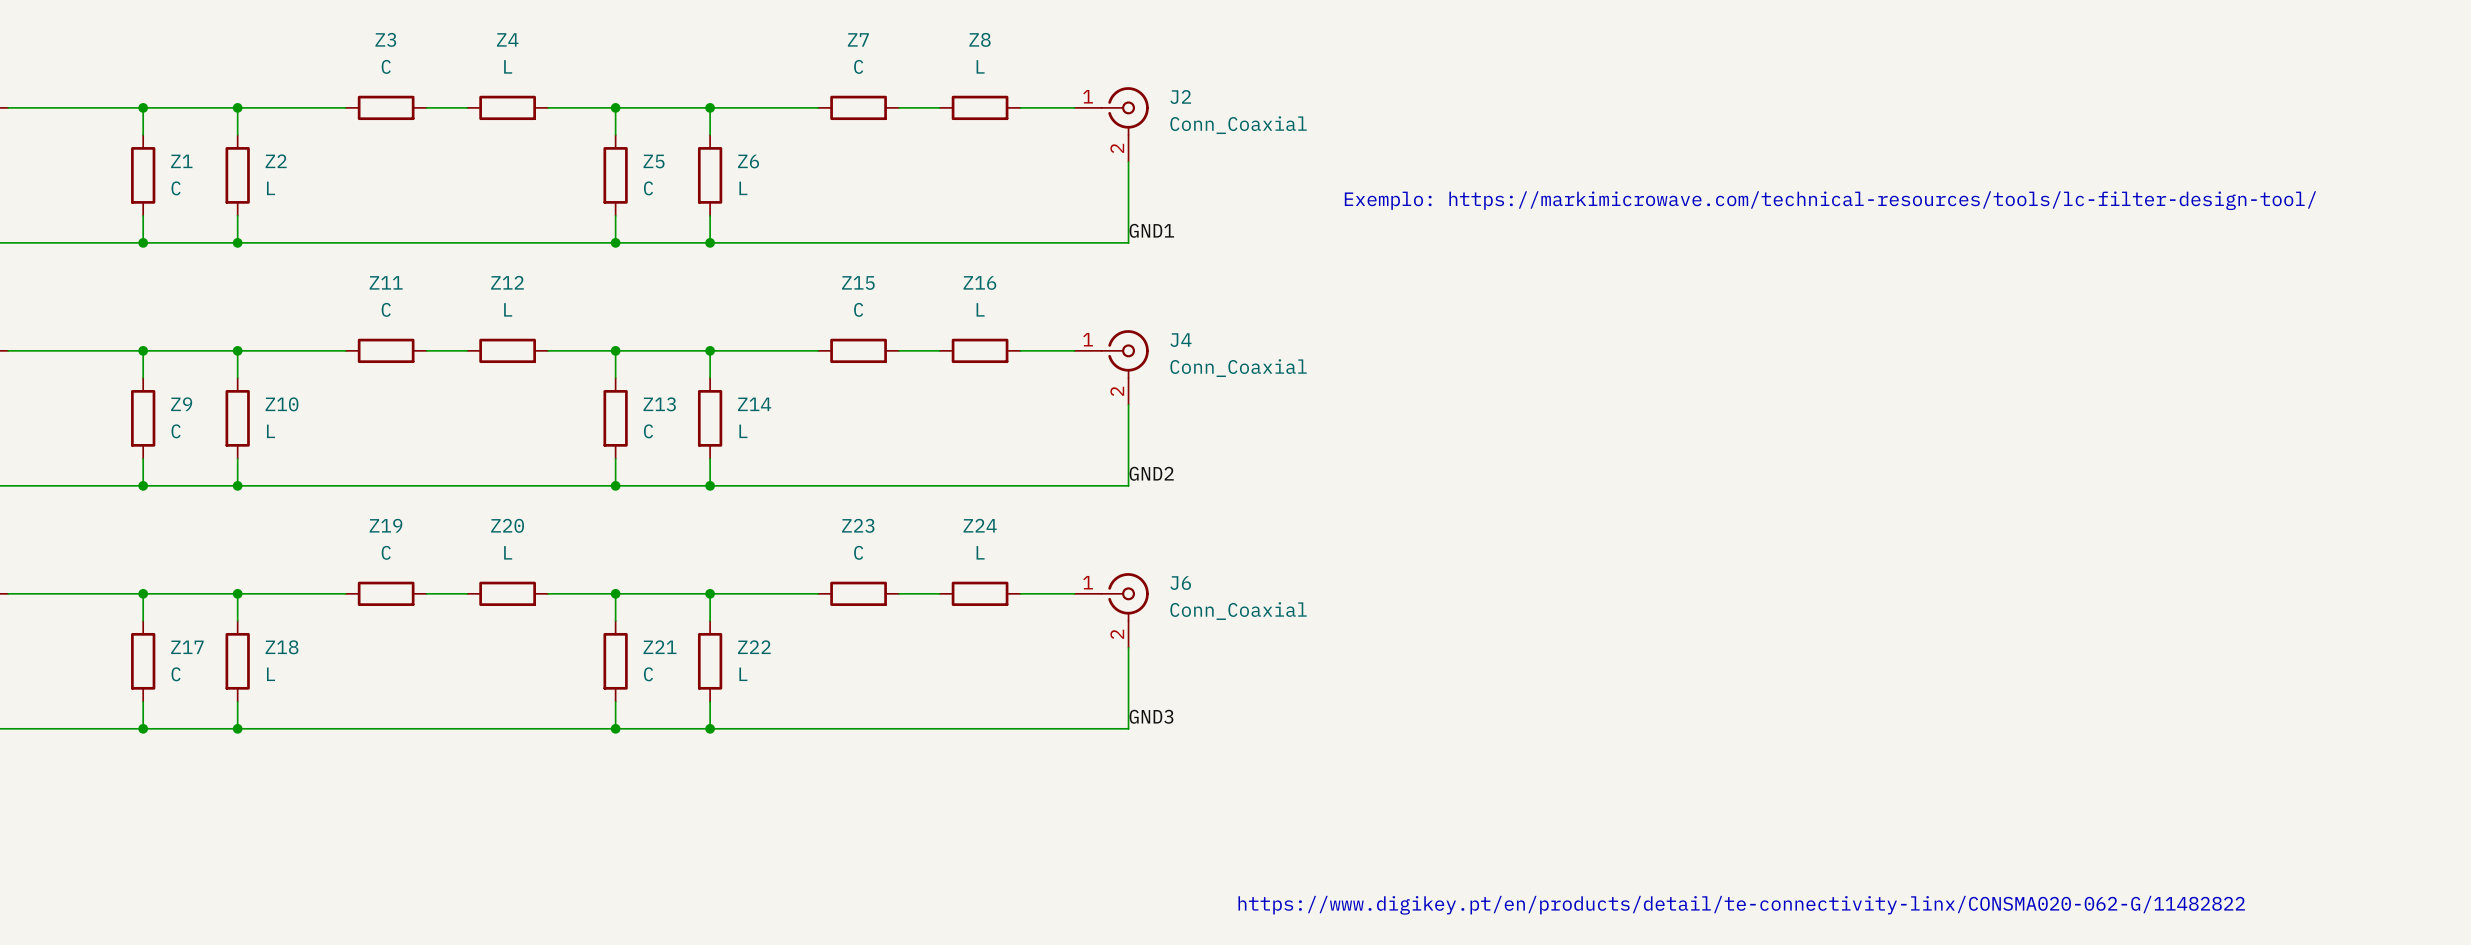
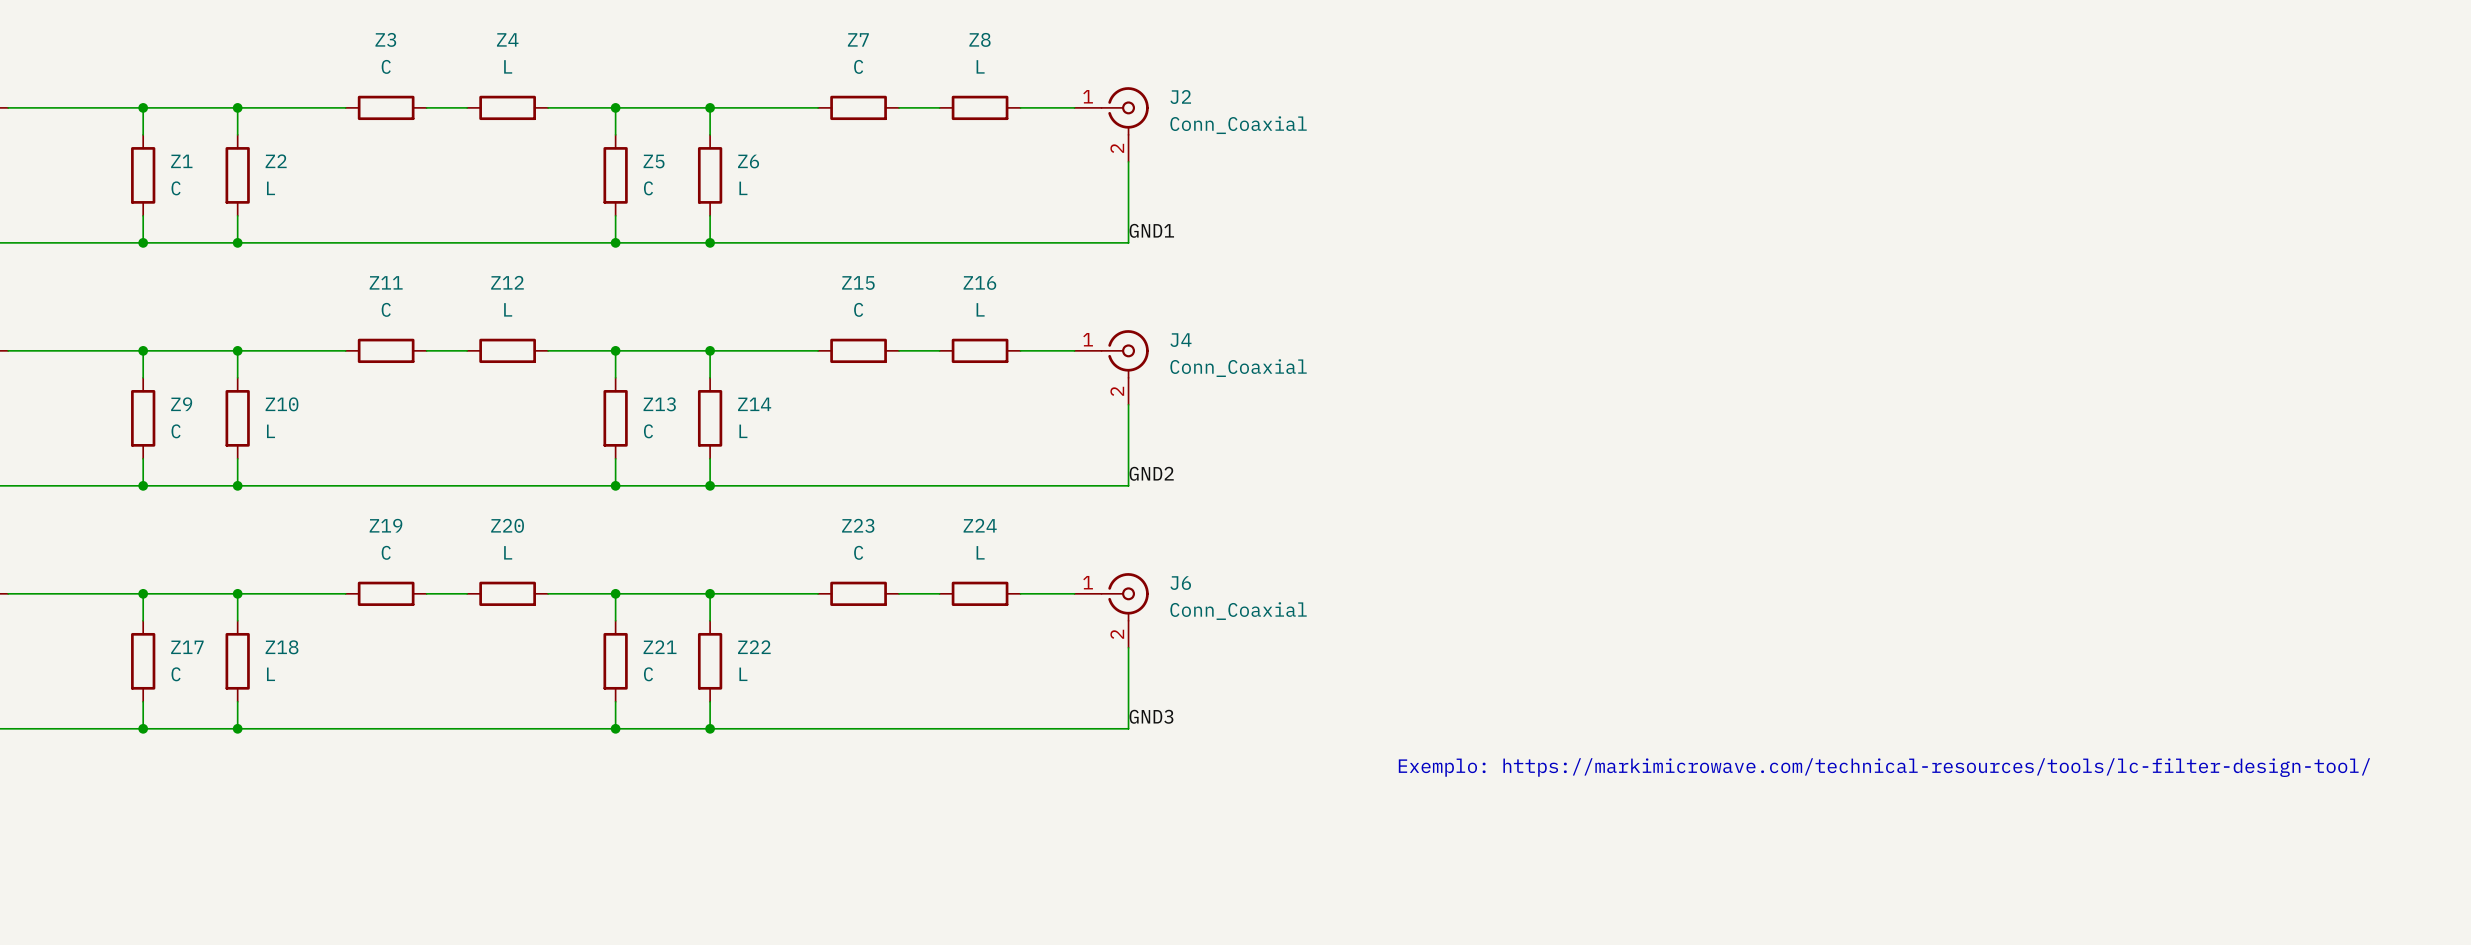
text: Exemplo: https://markimicrowave.com/technical-resources/tools/lc-filter-design-tool/ (1830, 200) -> none
text: none -> Exemplo: https://markimicrowave.com/technical-resources/tools/lc-filter-design-tool/ (1884, 767)
text: https://www.digikey.pt/en/products/detail/te-connectivity-linx/CONSMA020-062-G/11482822 (1741, 905) -> none

